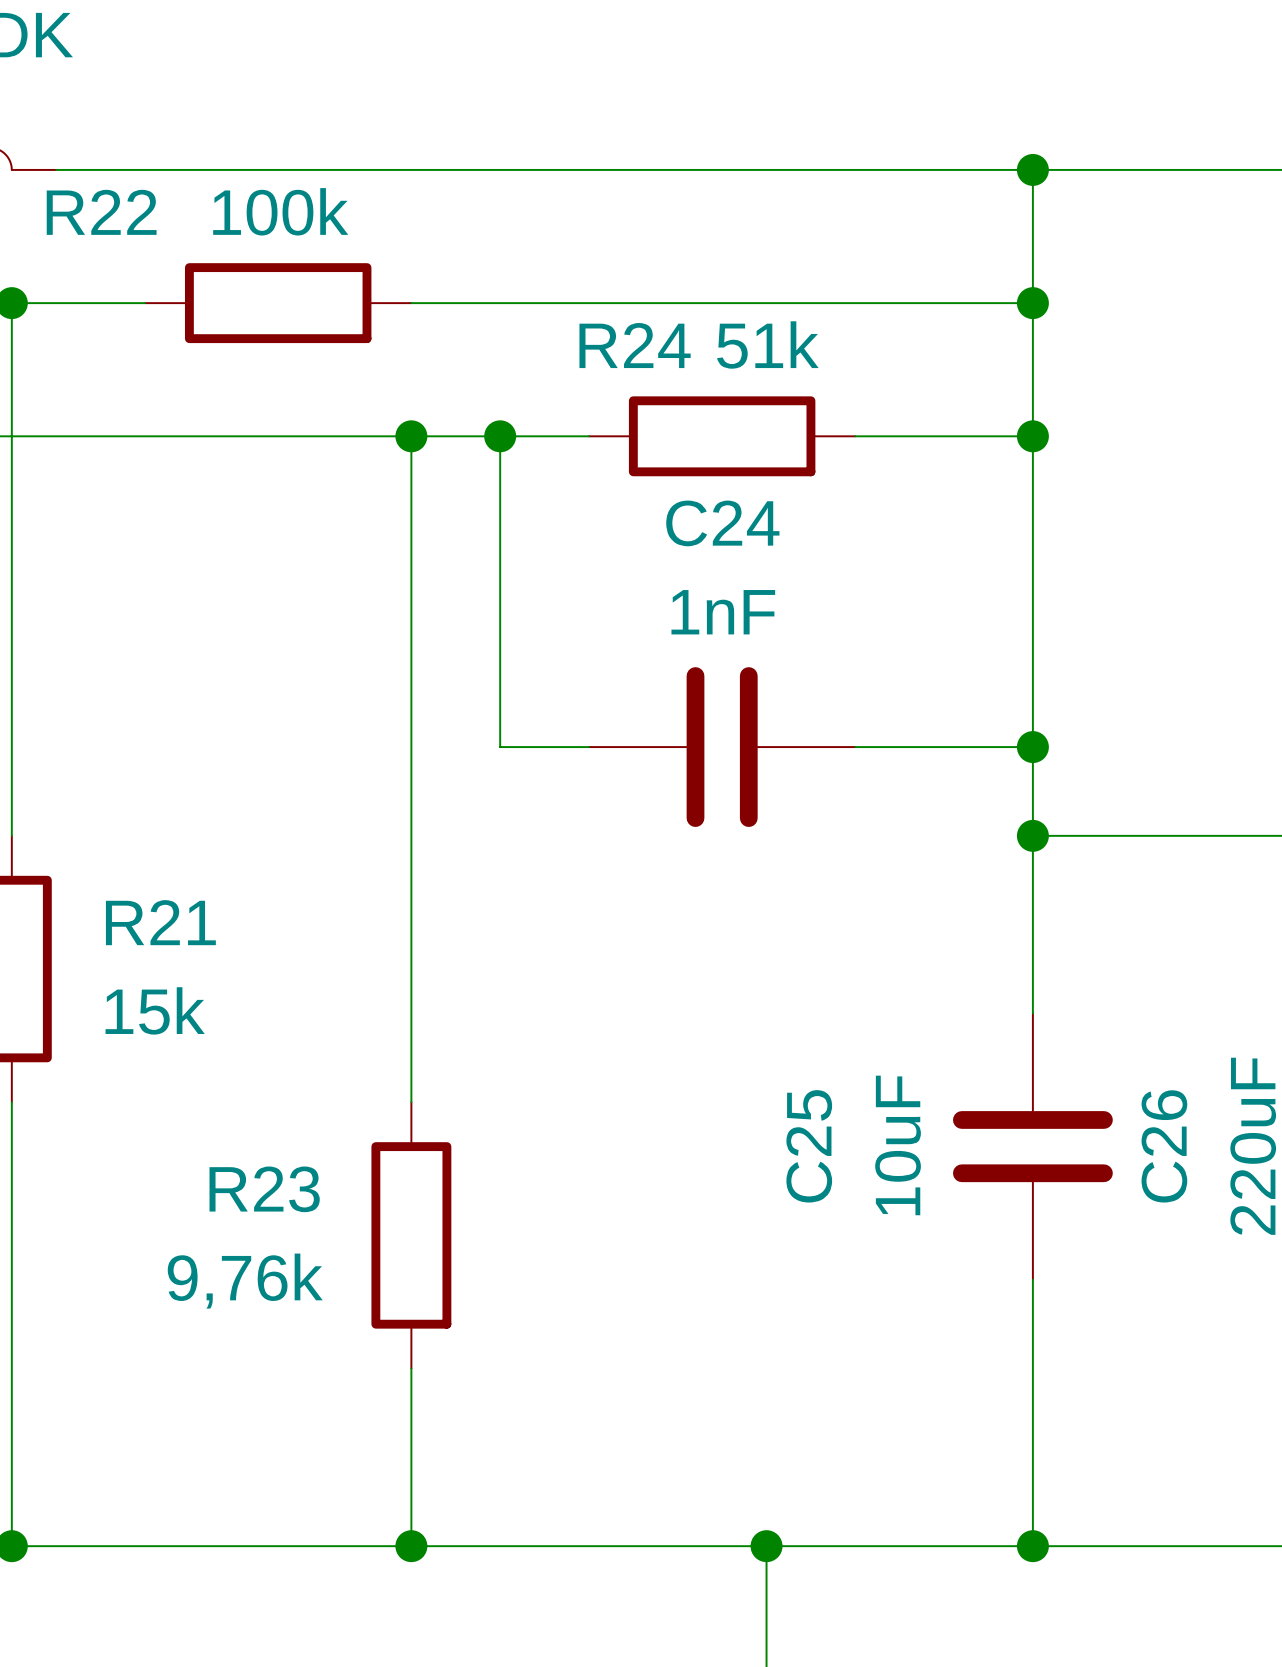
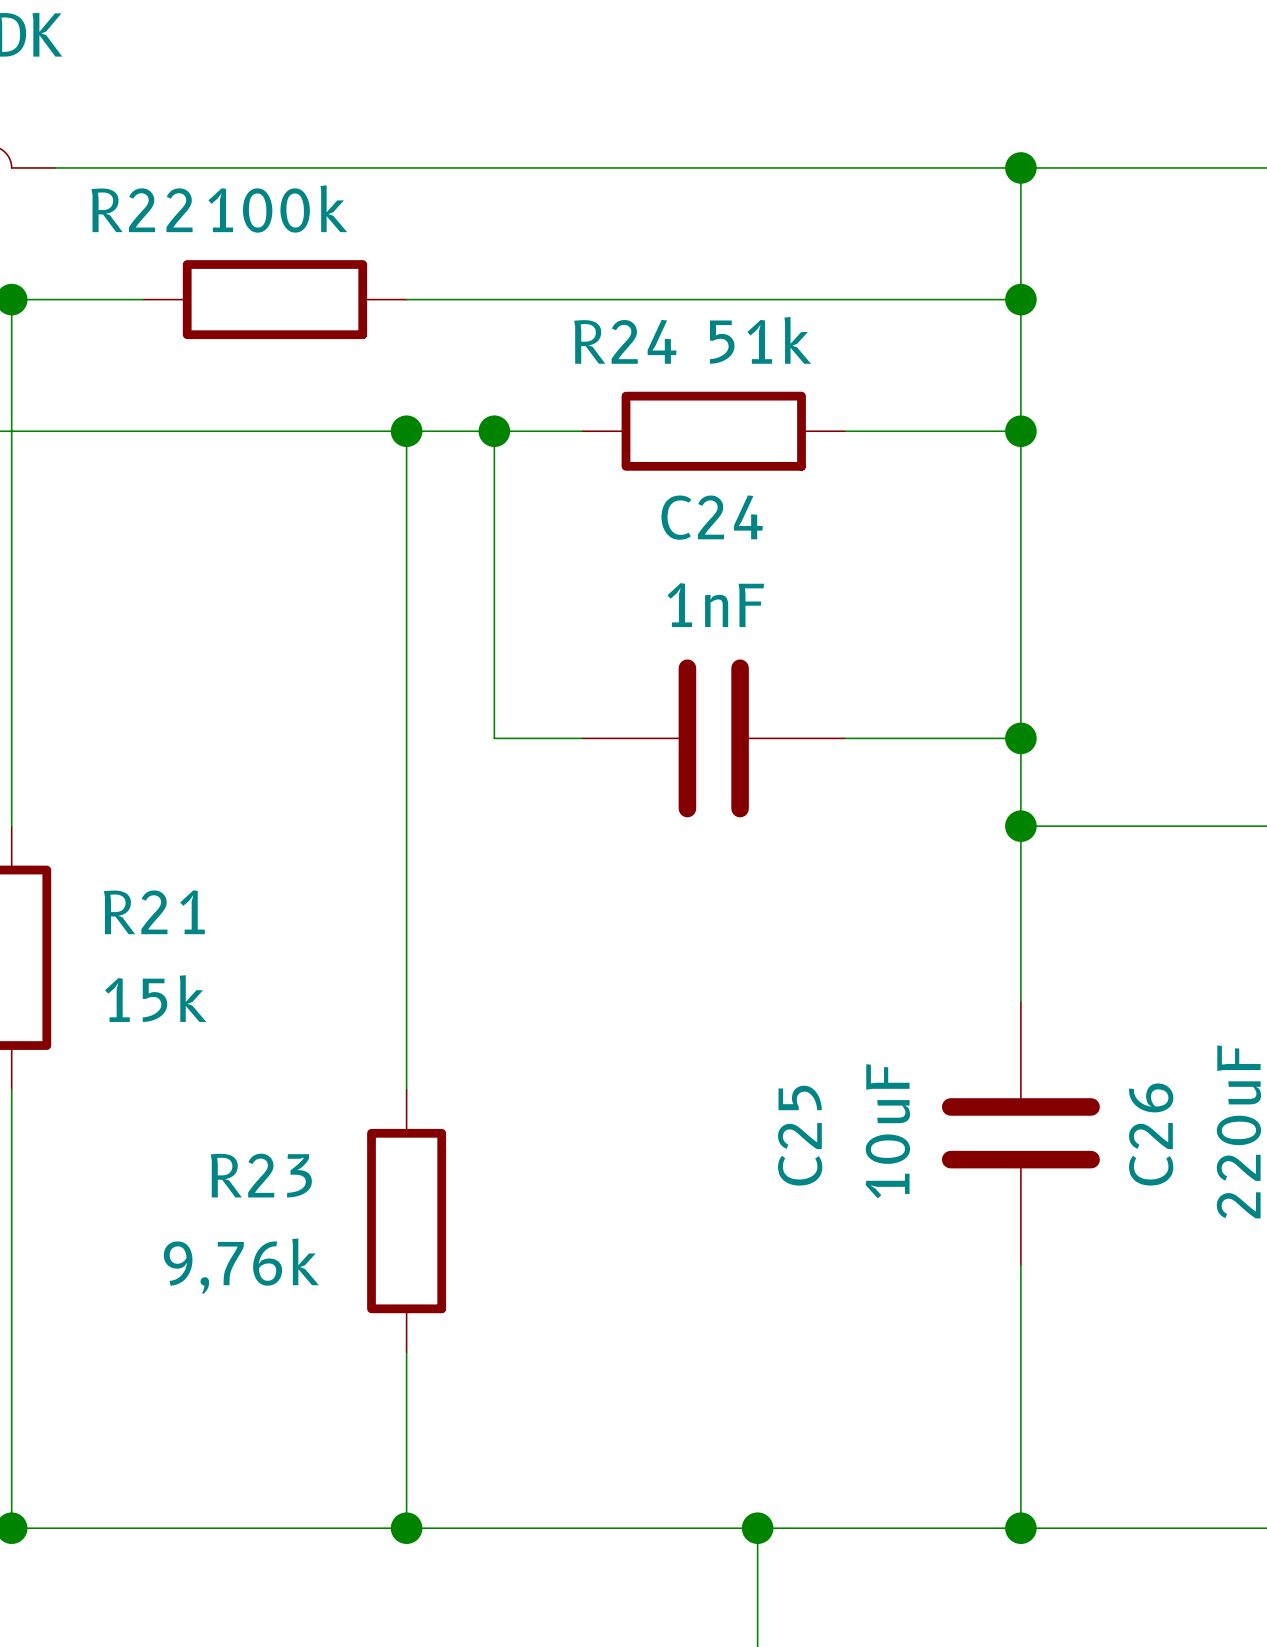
R22 name position: R22 (101, 212) -> R22 (142, 210)

